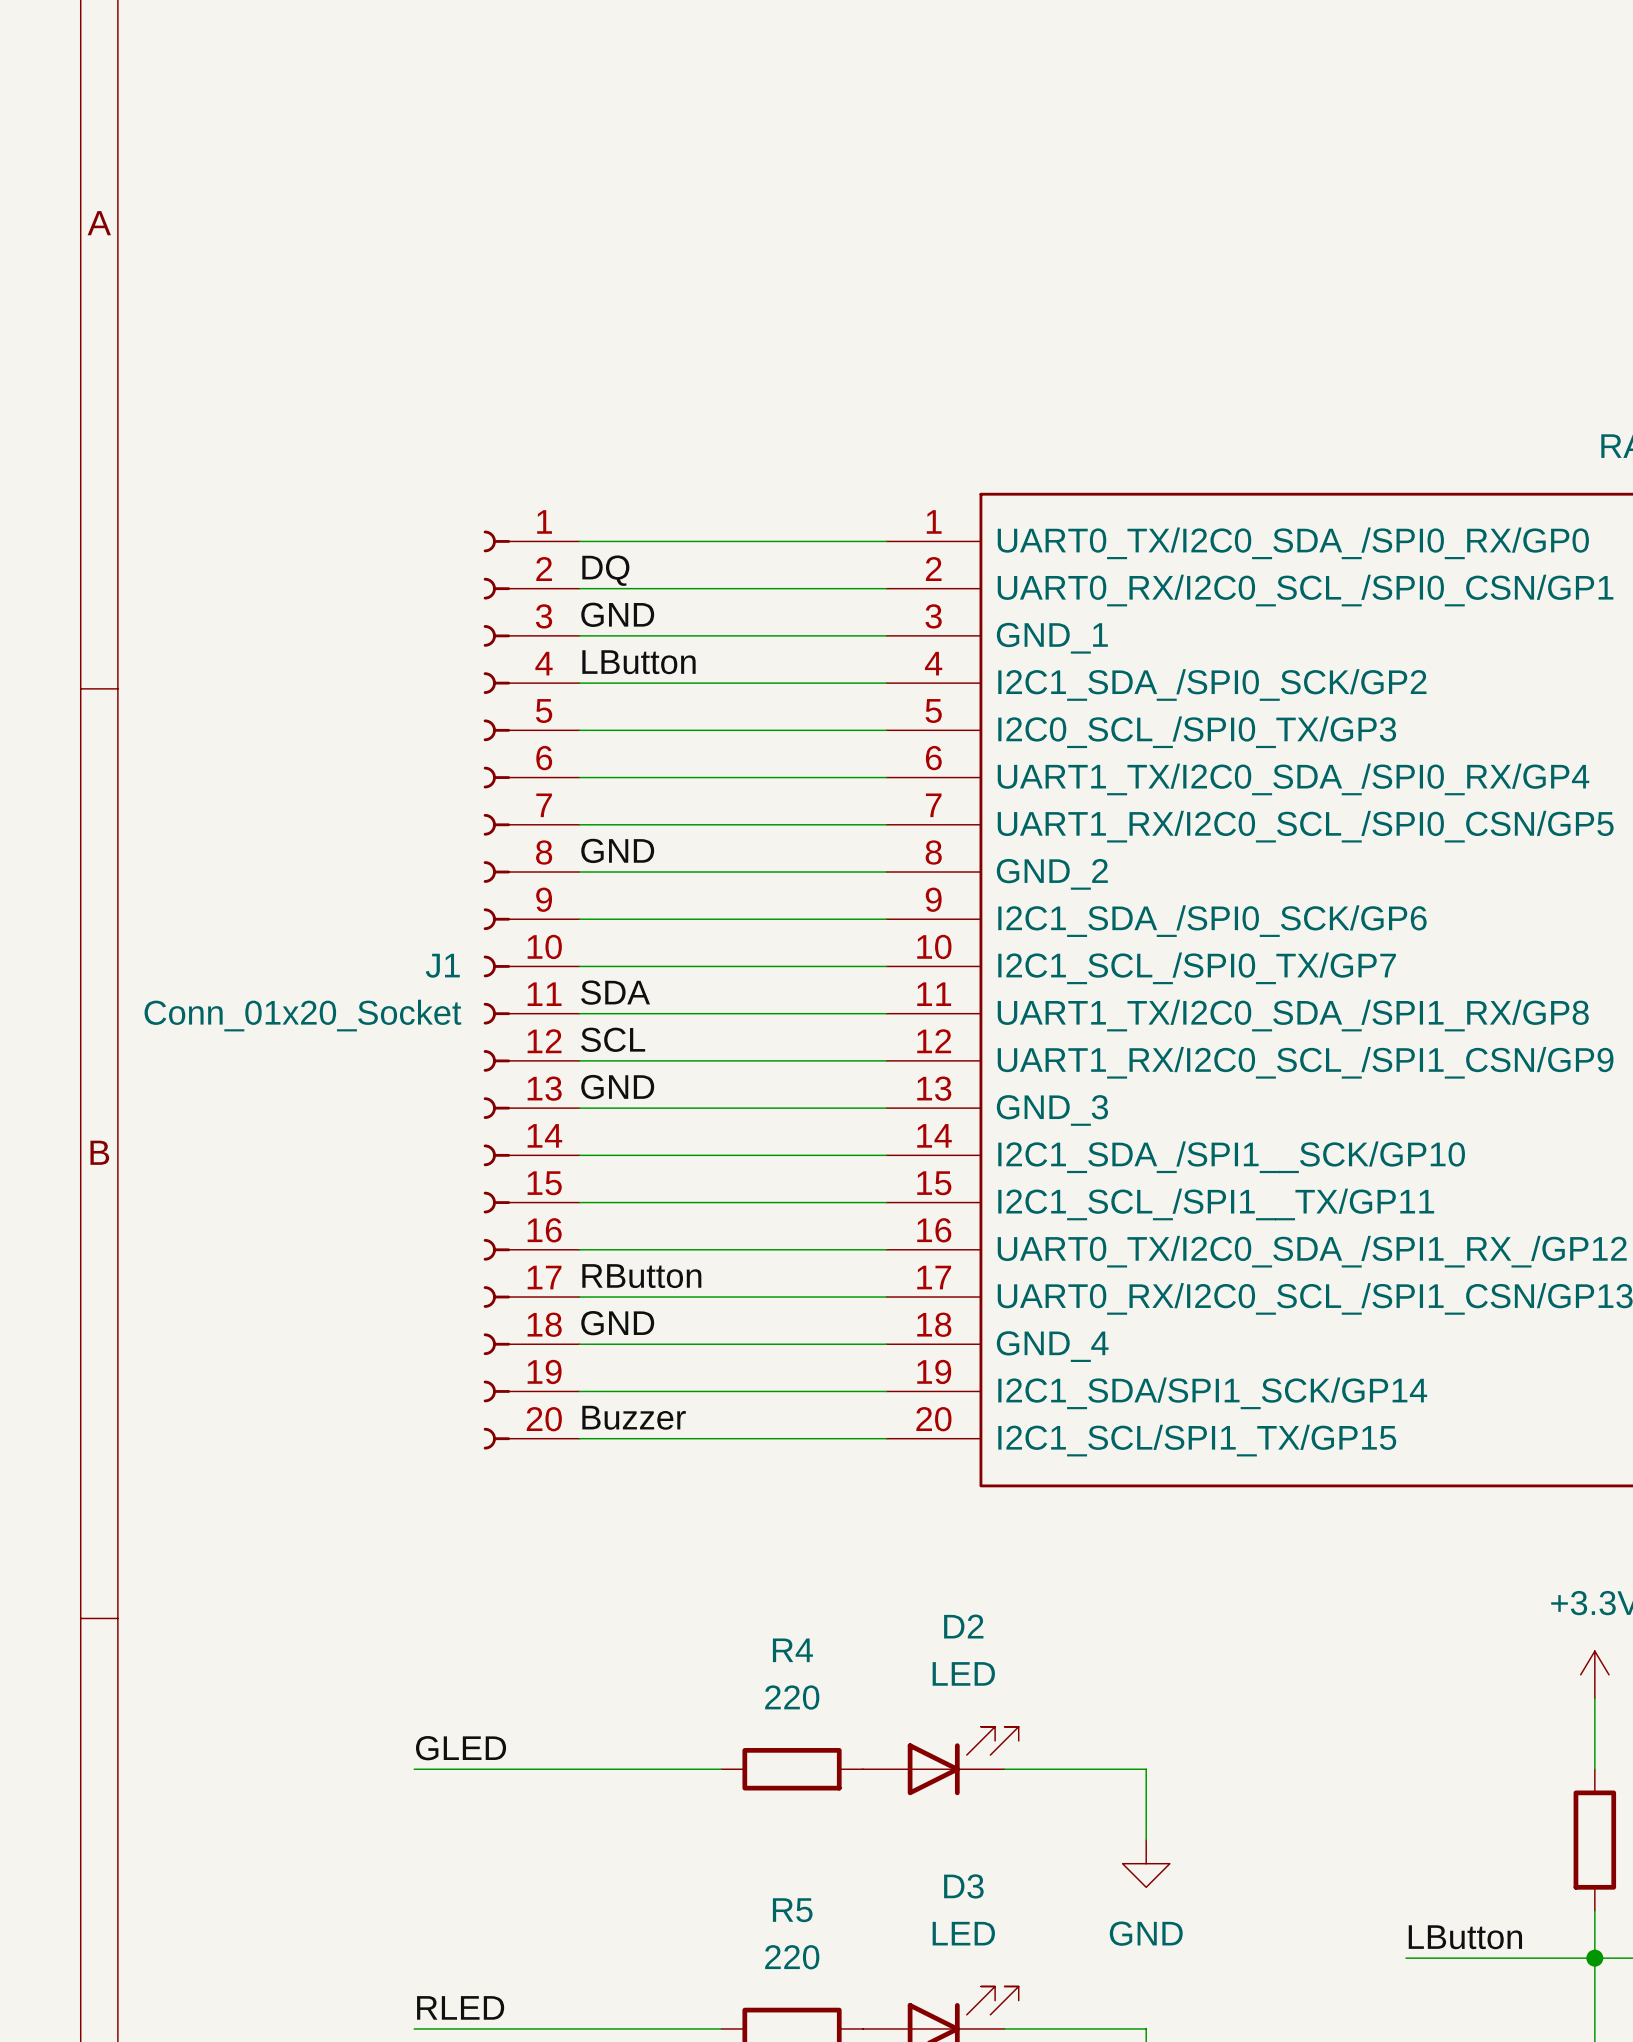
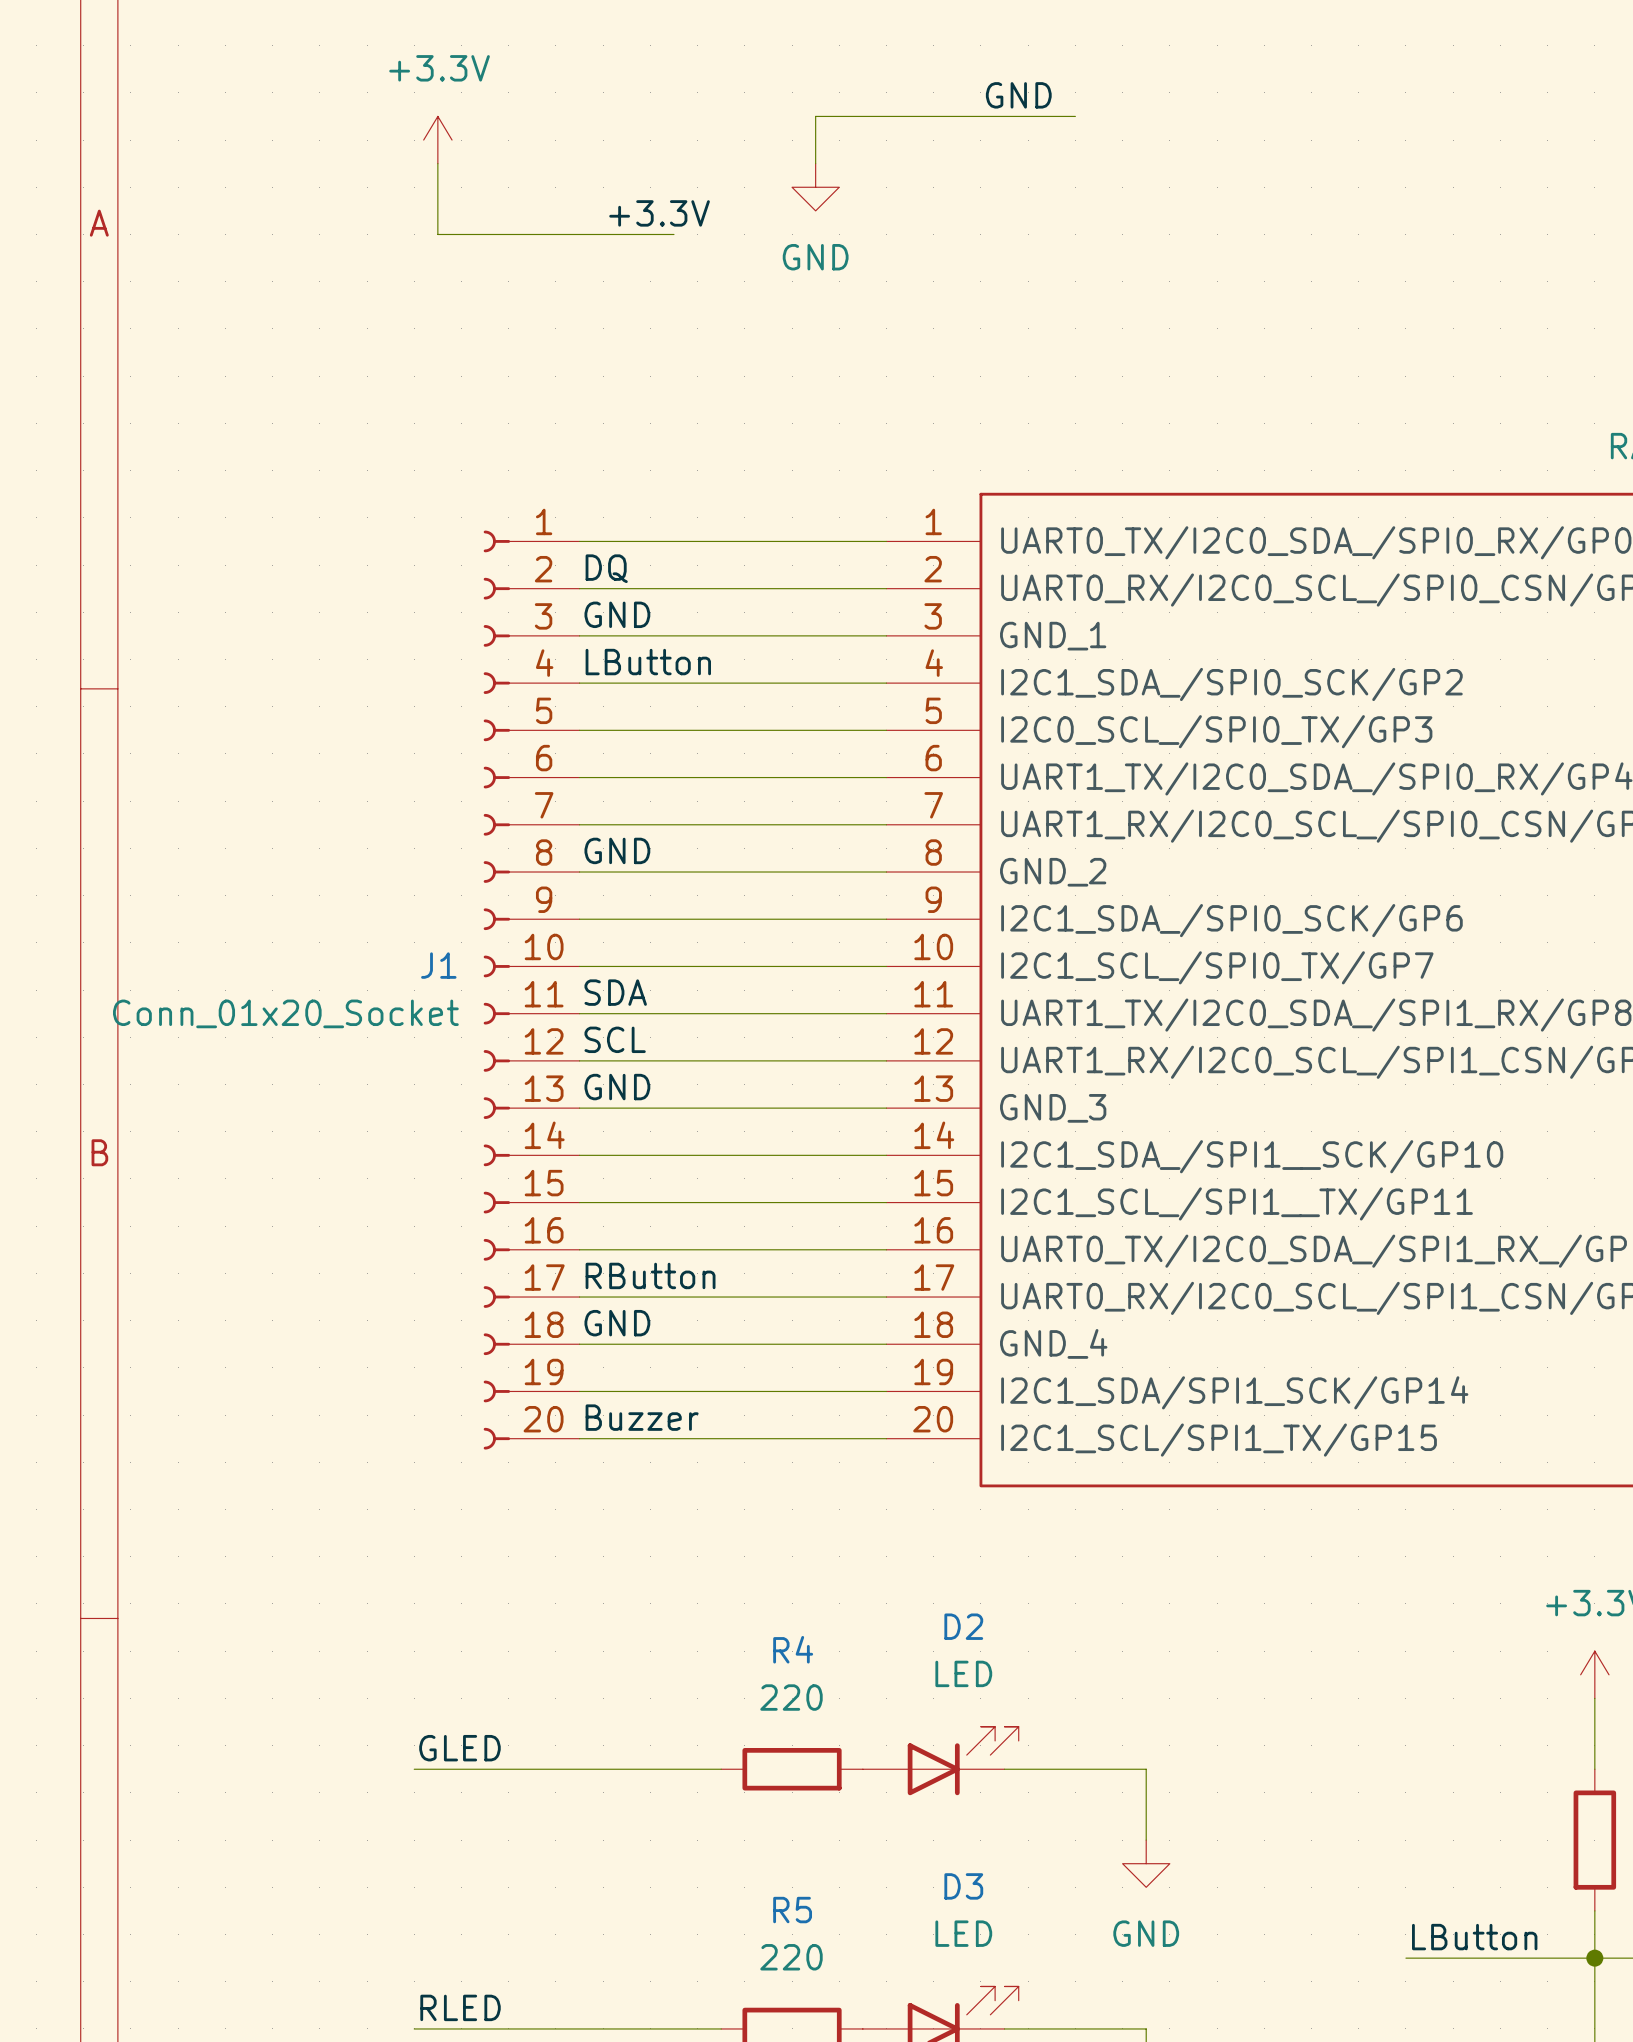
label: none -> GND (1018, 95)
wire: none -> (1075, 116) (815, 116) (815, 163)
power symbol: none -> +3.3V (437, 140)
wire: none -> (437, 163) (437, 234) (673, 234)
power symbol: none -> GND (815, 187)
label: none -> +3.3V (659, 213)

